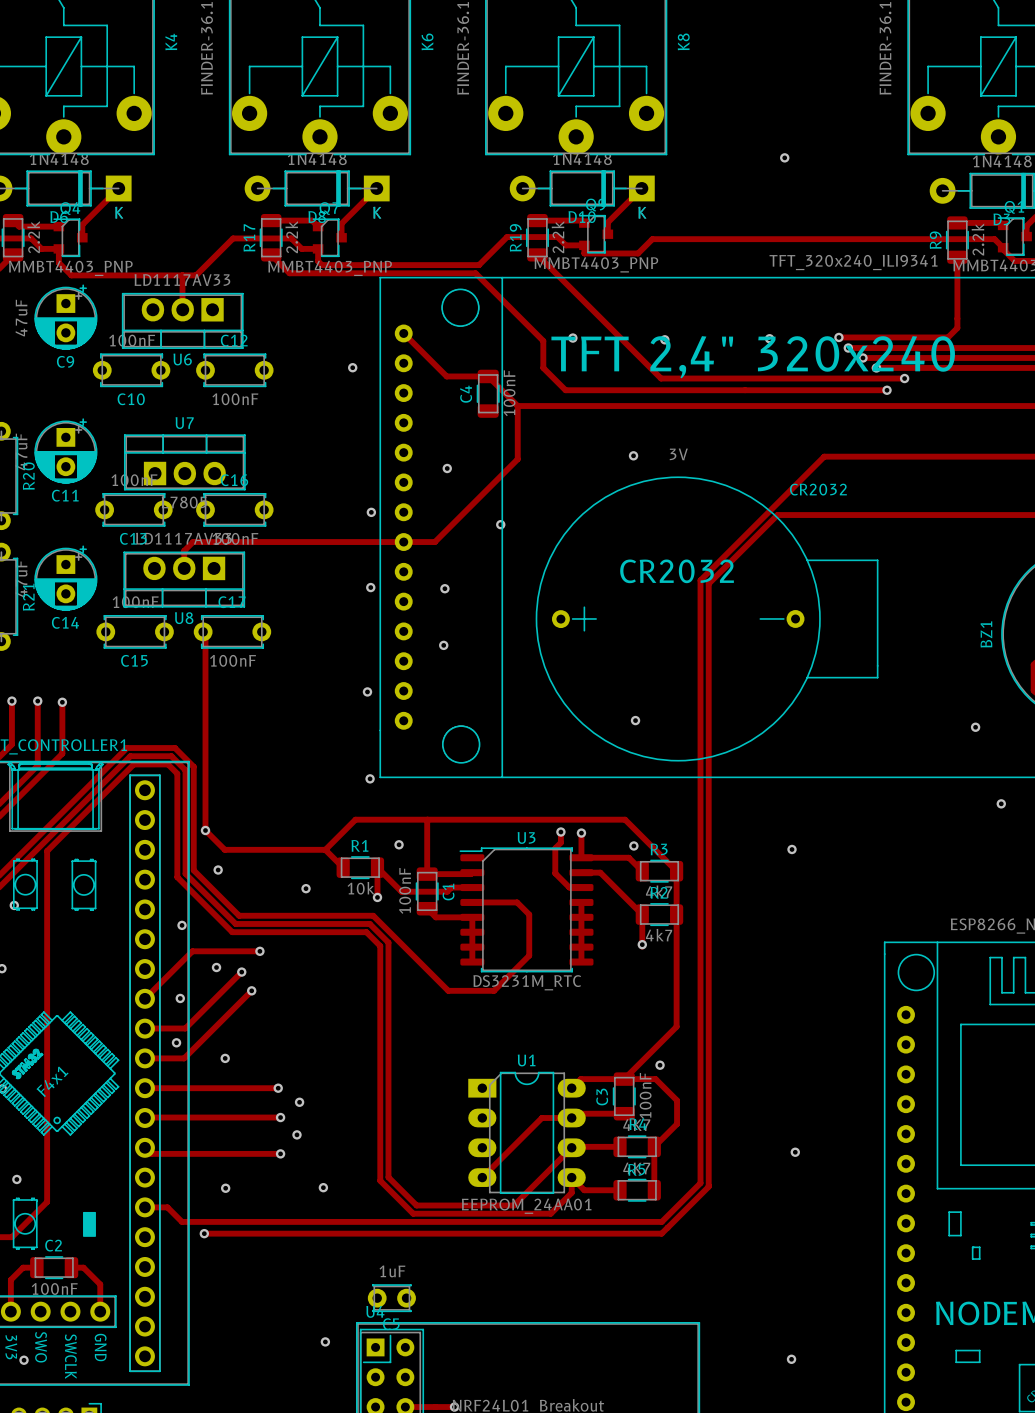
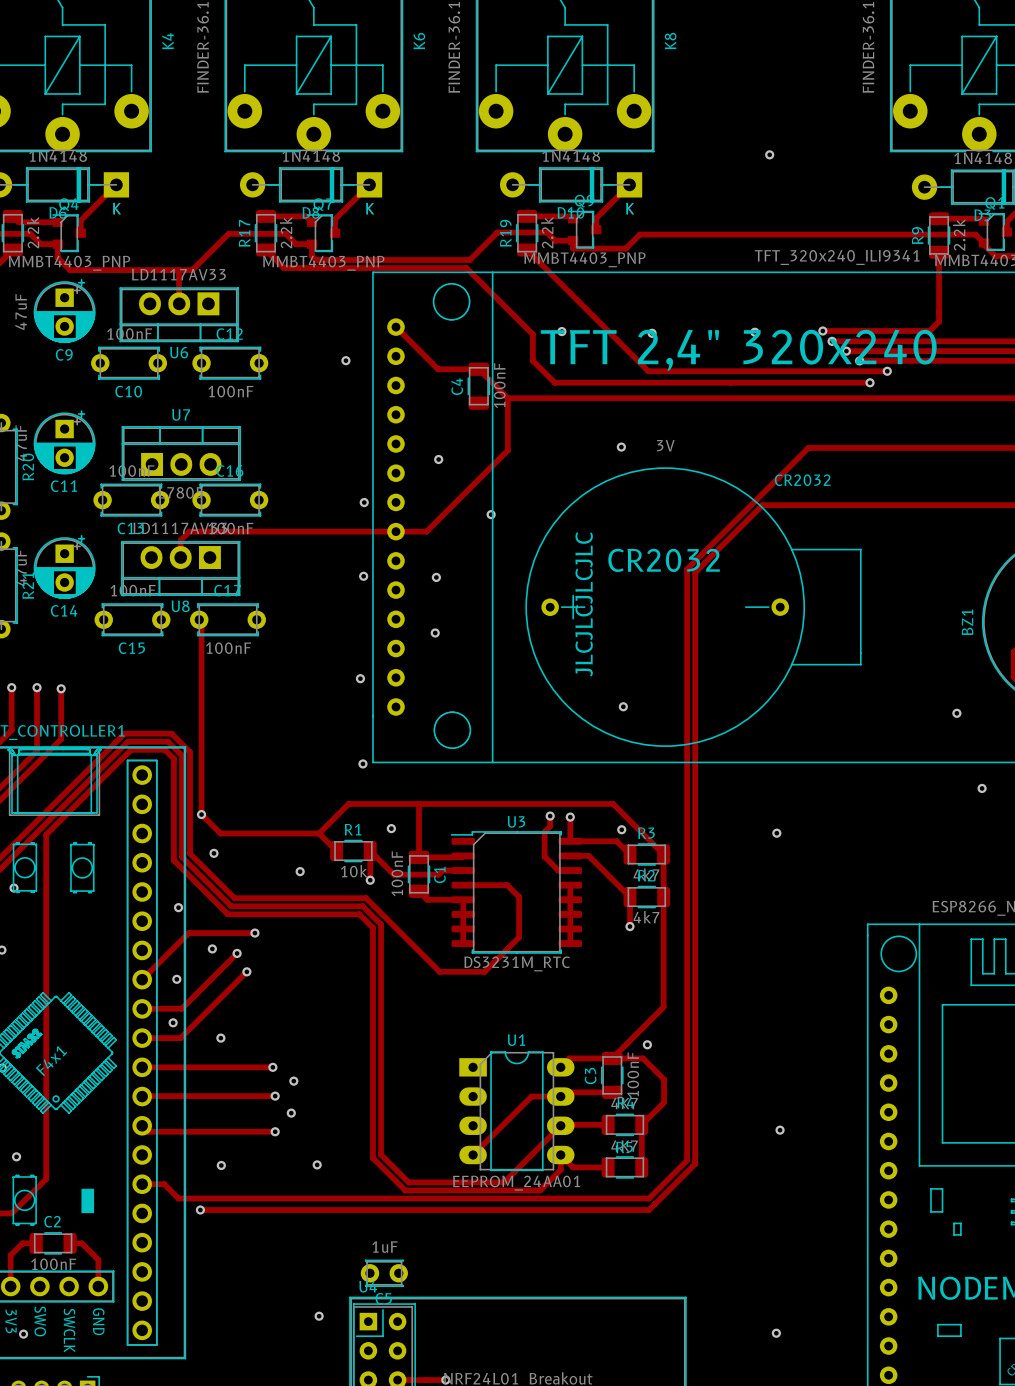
text: none -> JLCJLCJLCJLC (584, 604)

